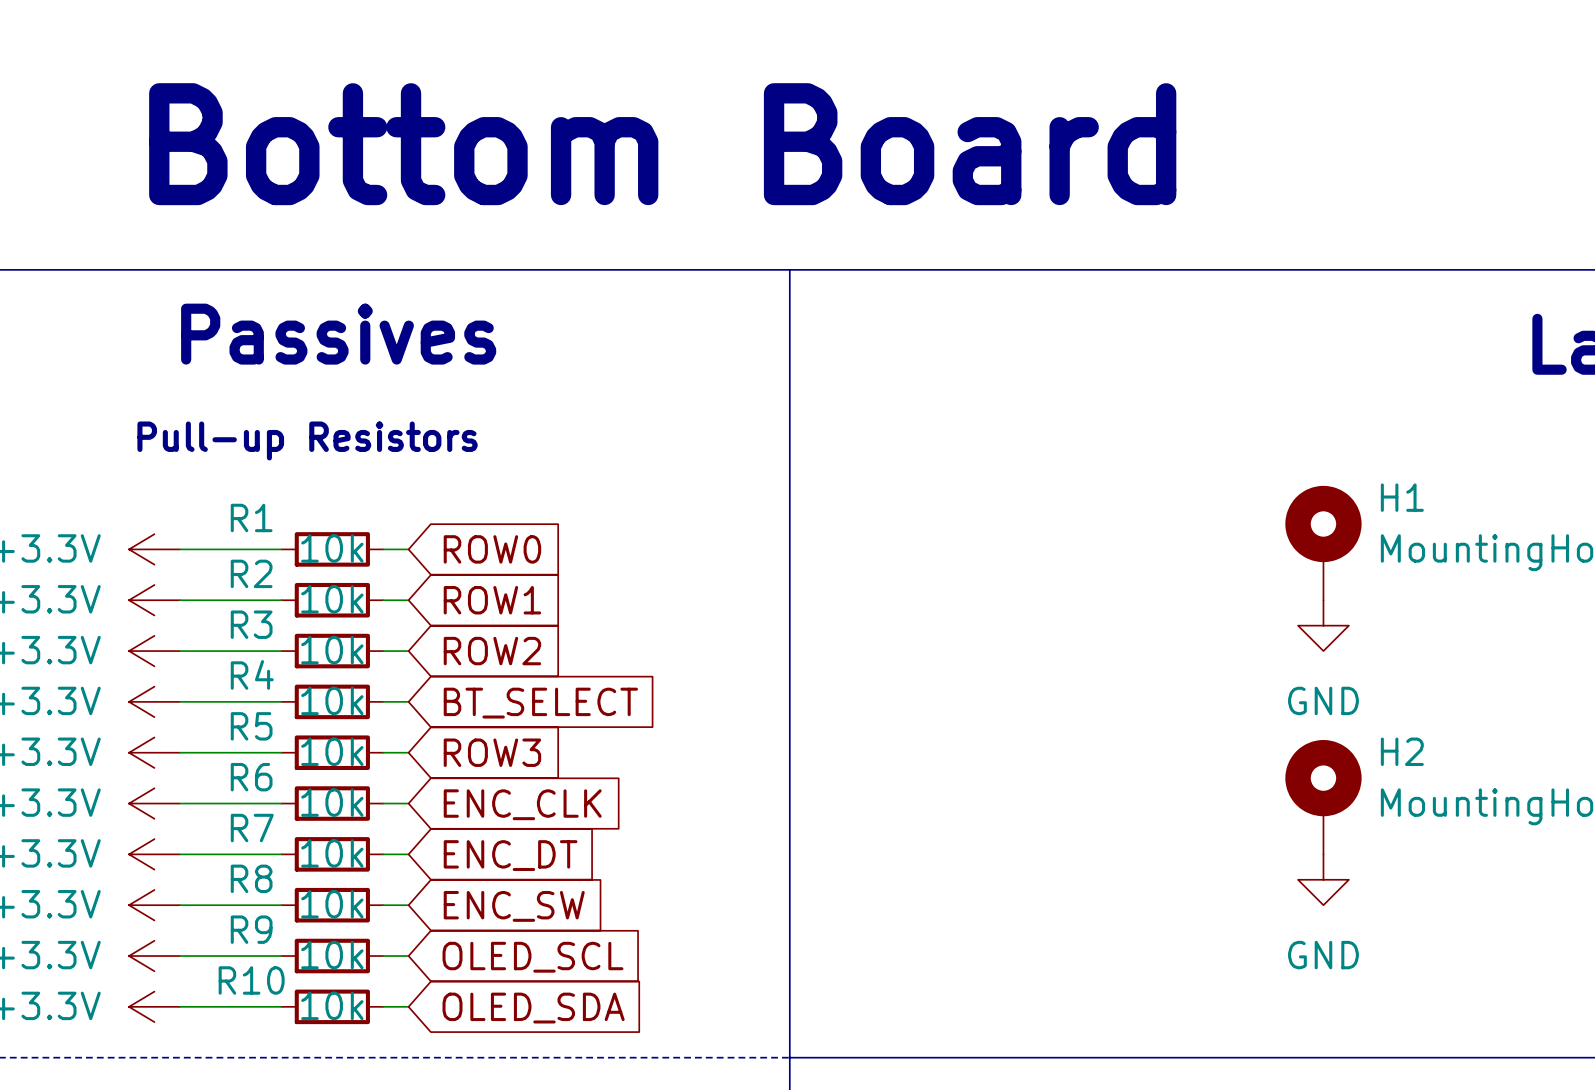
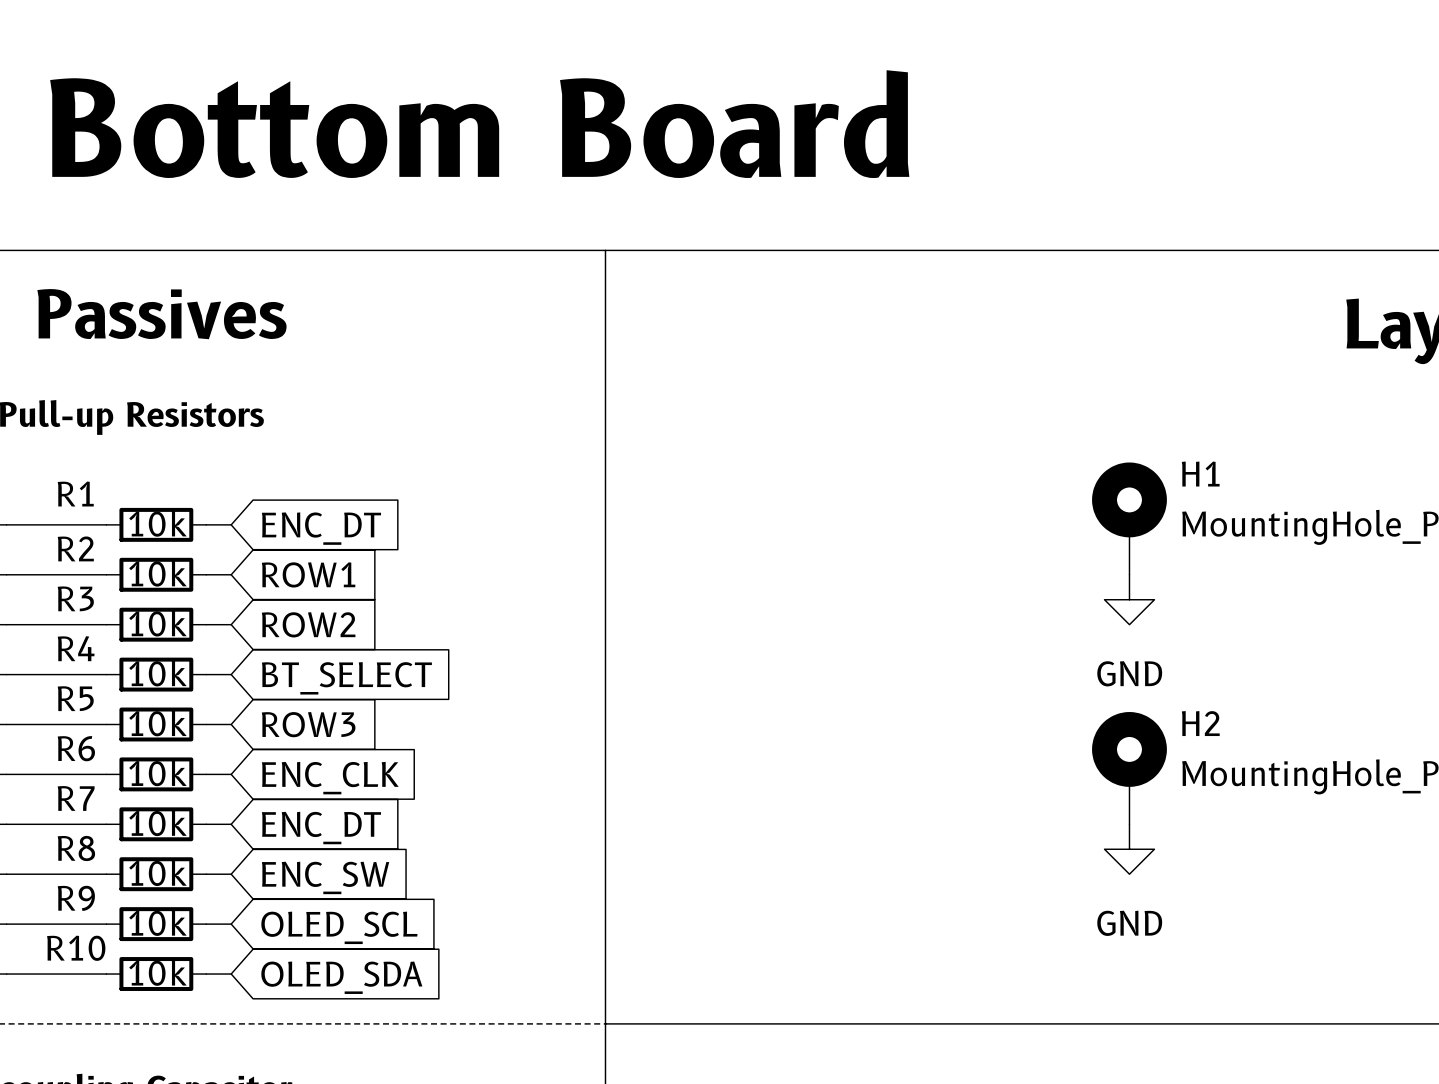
global label: ROW0 (492, 549) -> ENC_DT (321, 528)

